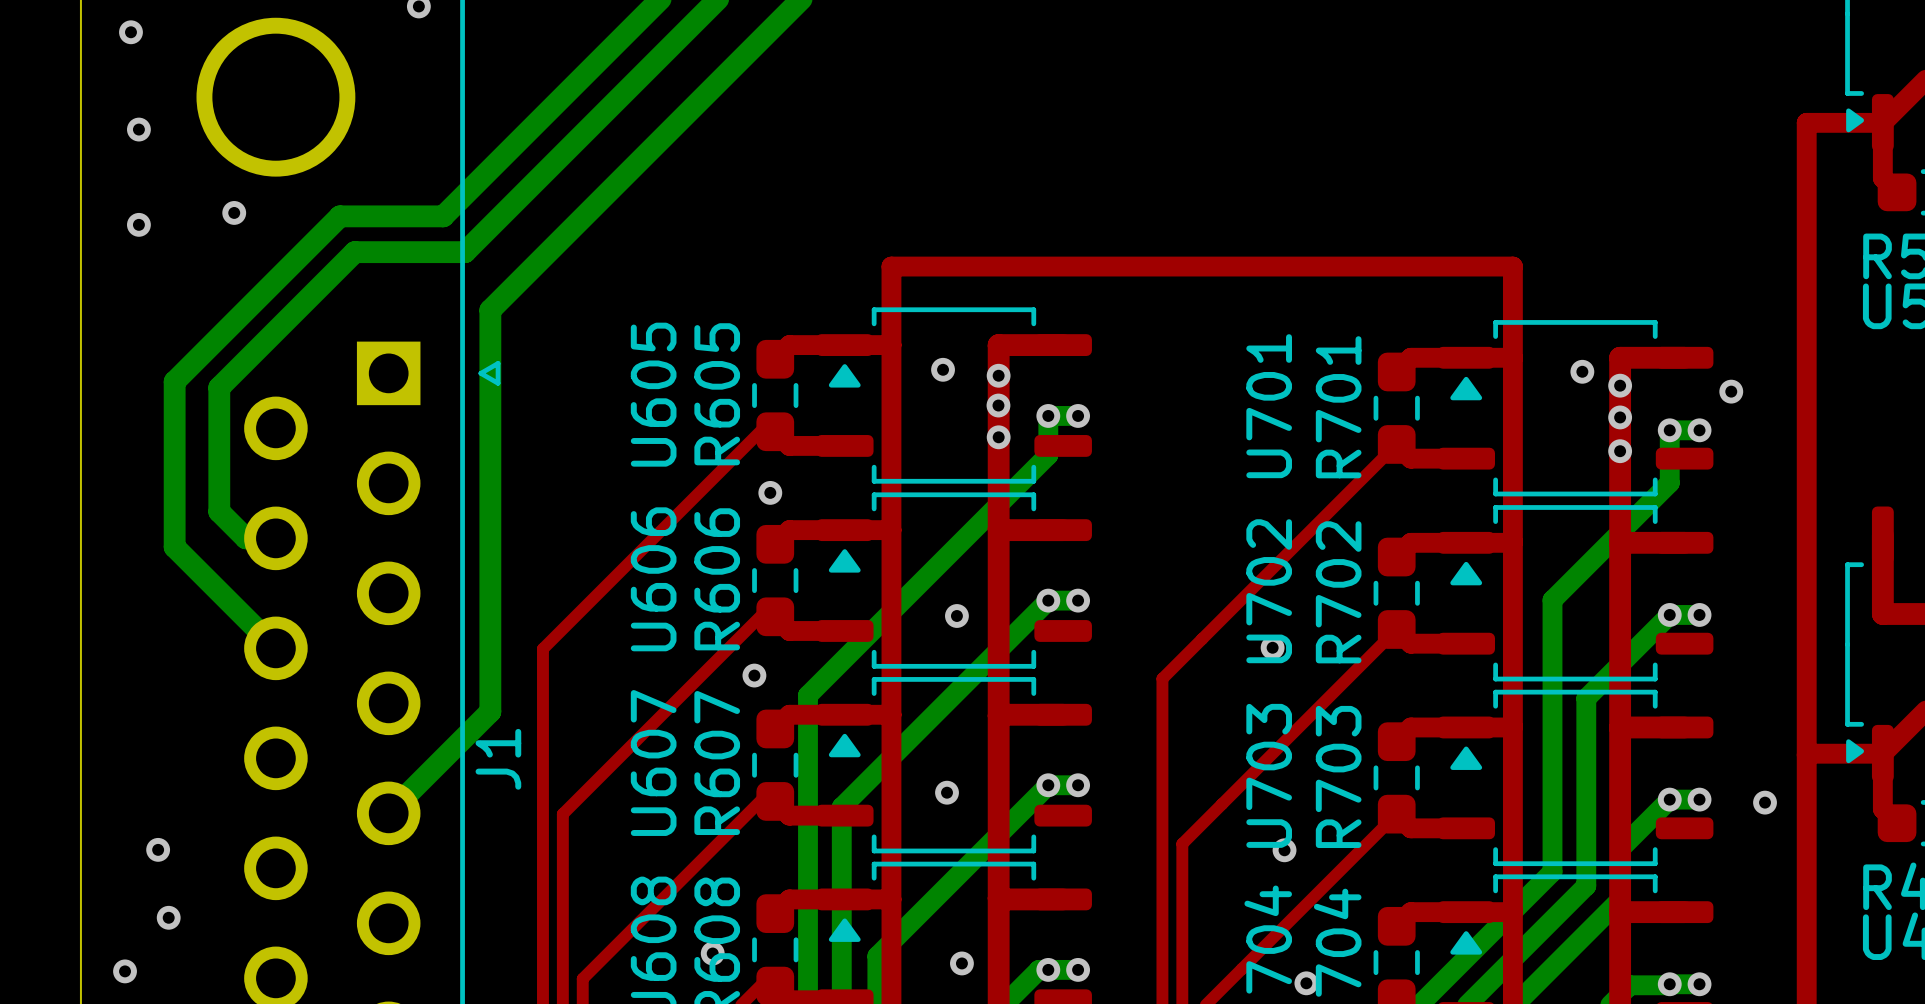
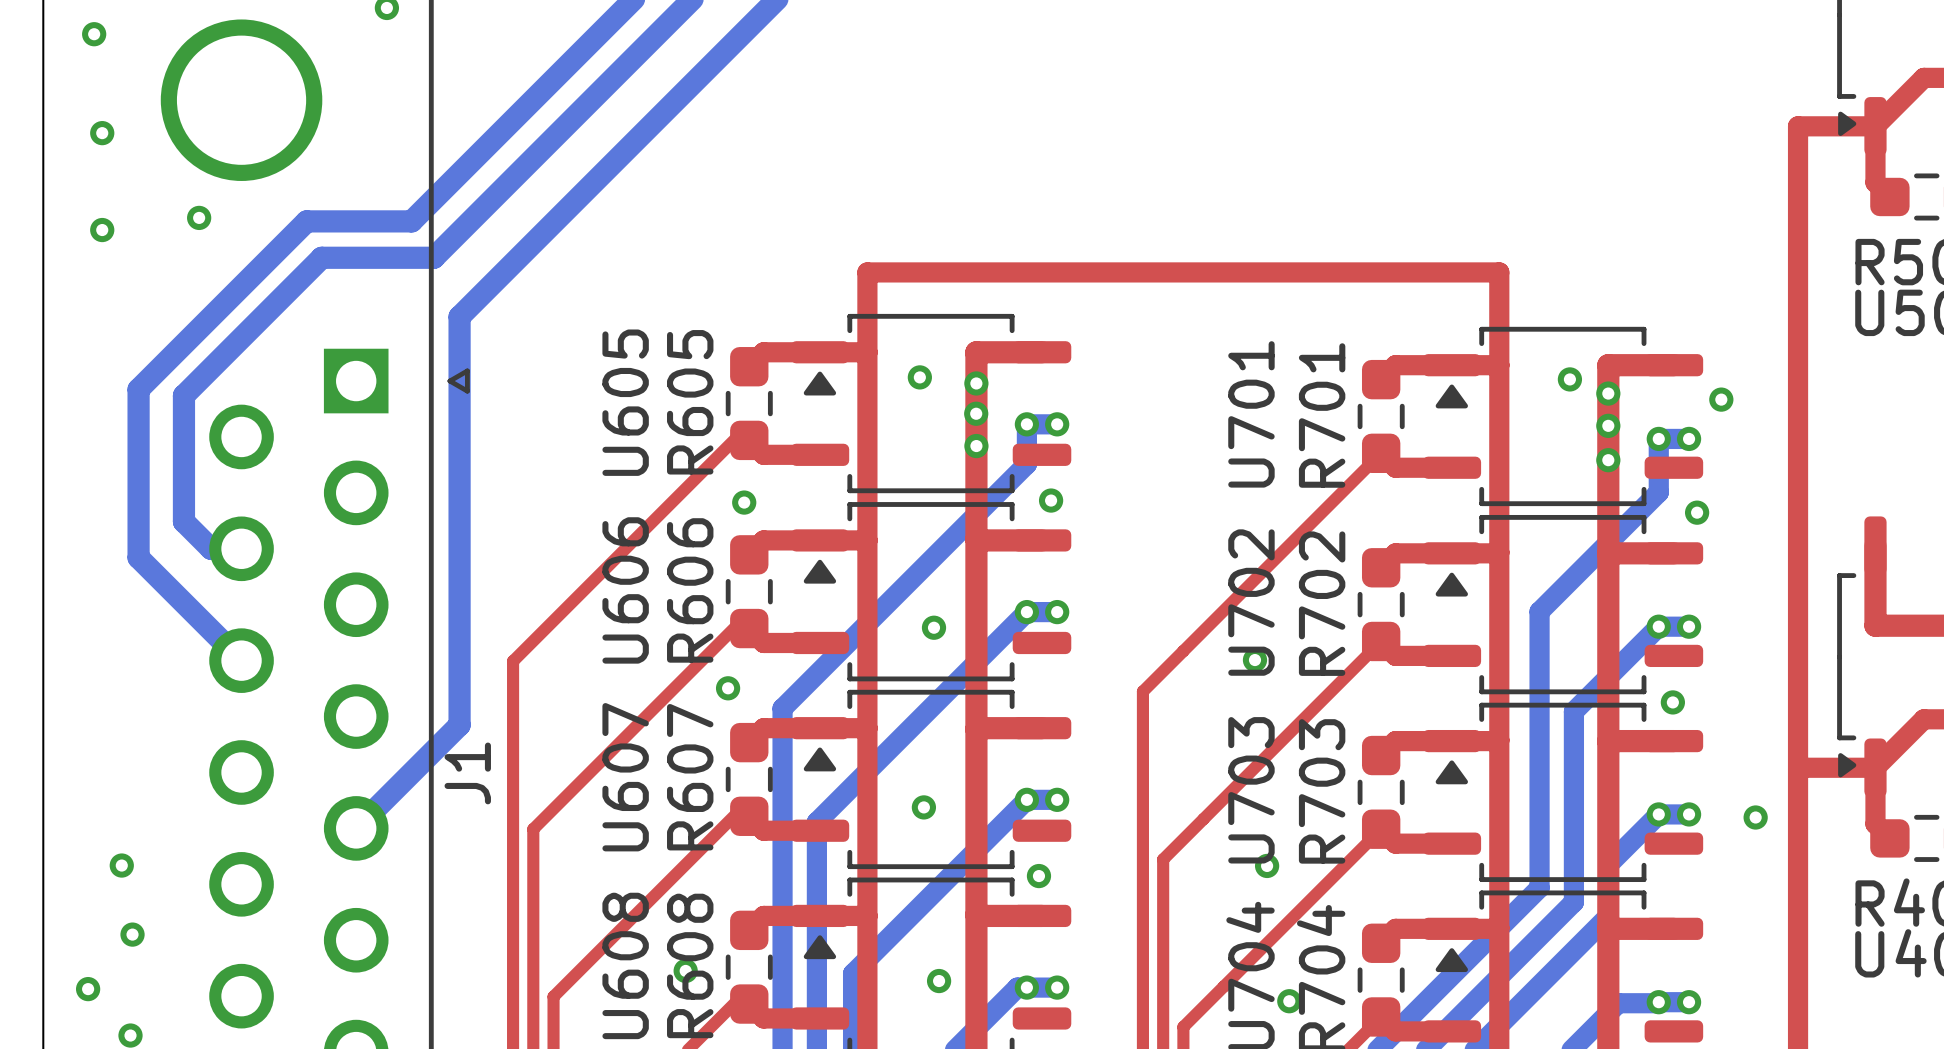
via: none -> (1051, 500)
via: none -> (1697, 512)
via: none -> (1672, 702)
via: none -> (1038, 876)

